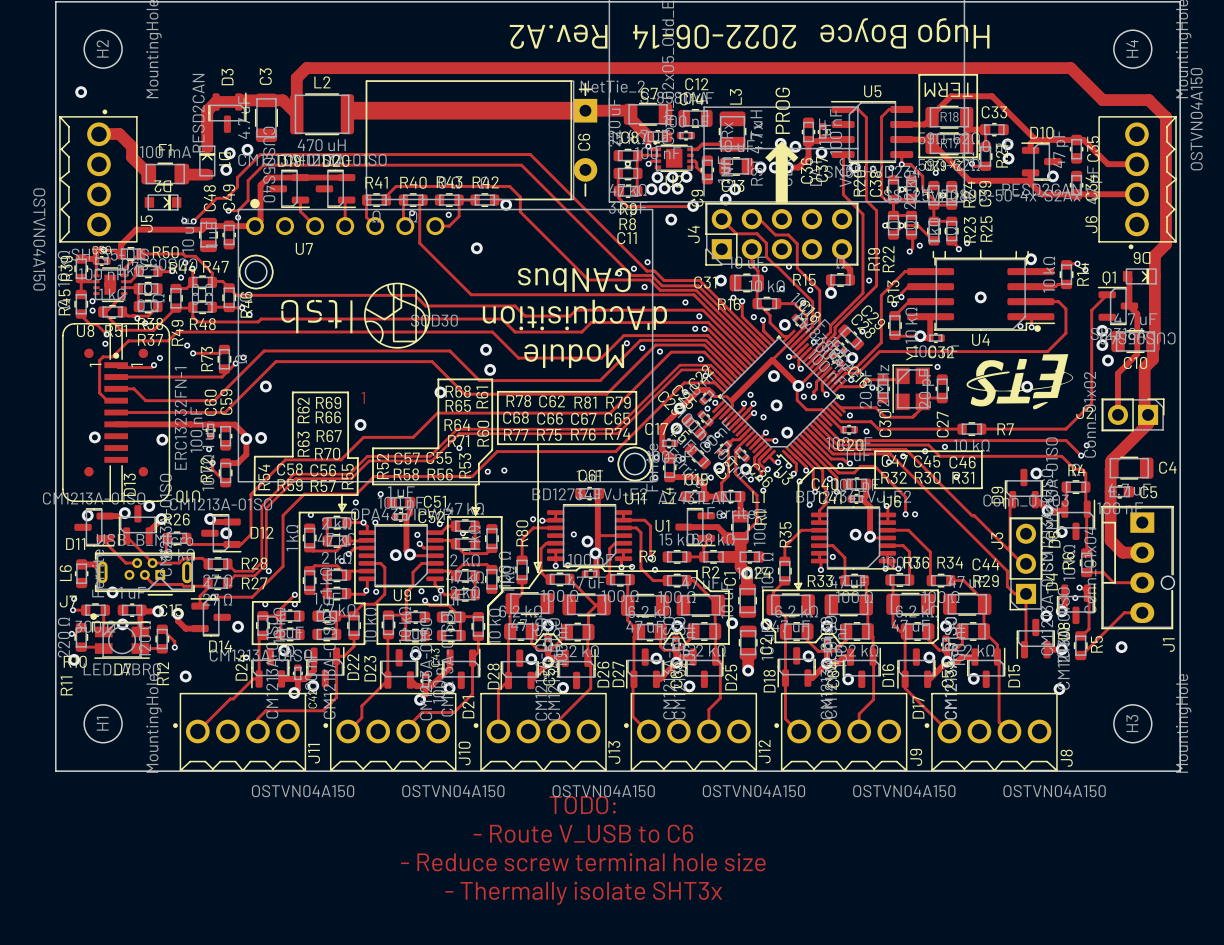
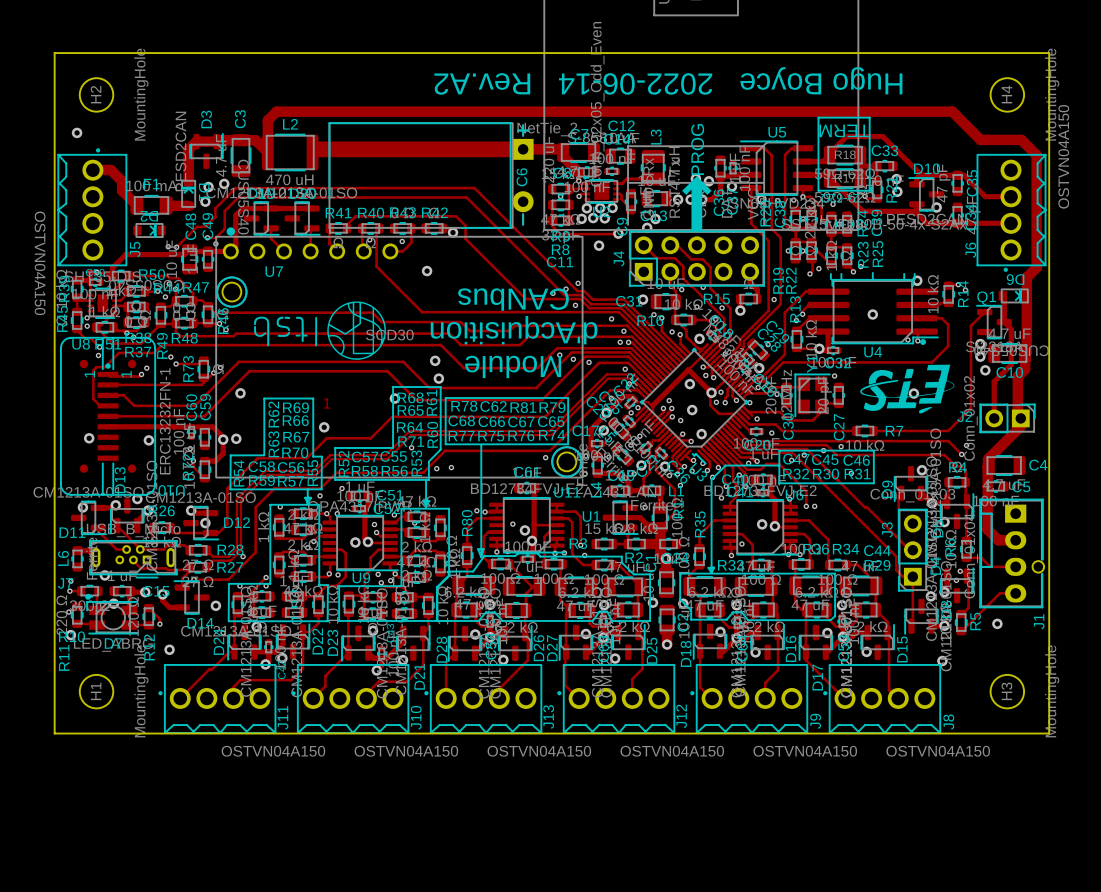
text: TODO: (582, 805) -> none
text: - Route V_USB to C6 (583, 833) -> none
text: - Reduce screw terminal hole size (583, 862) -> none
text: - Thermally isolate SHT3x (583, 893) -> none

